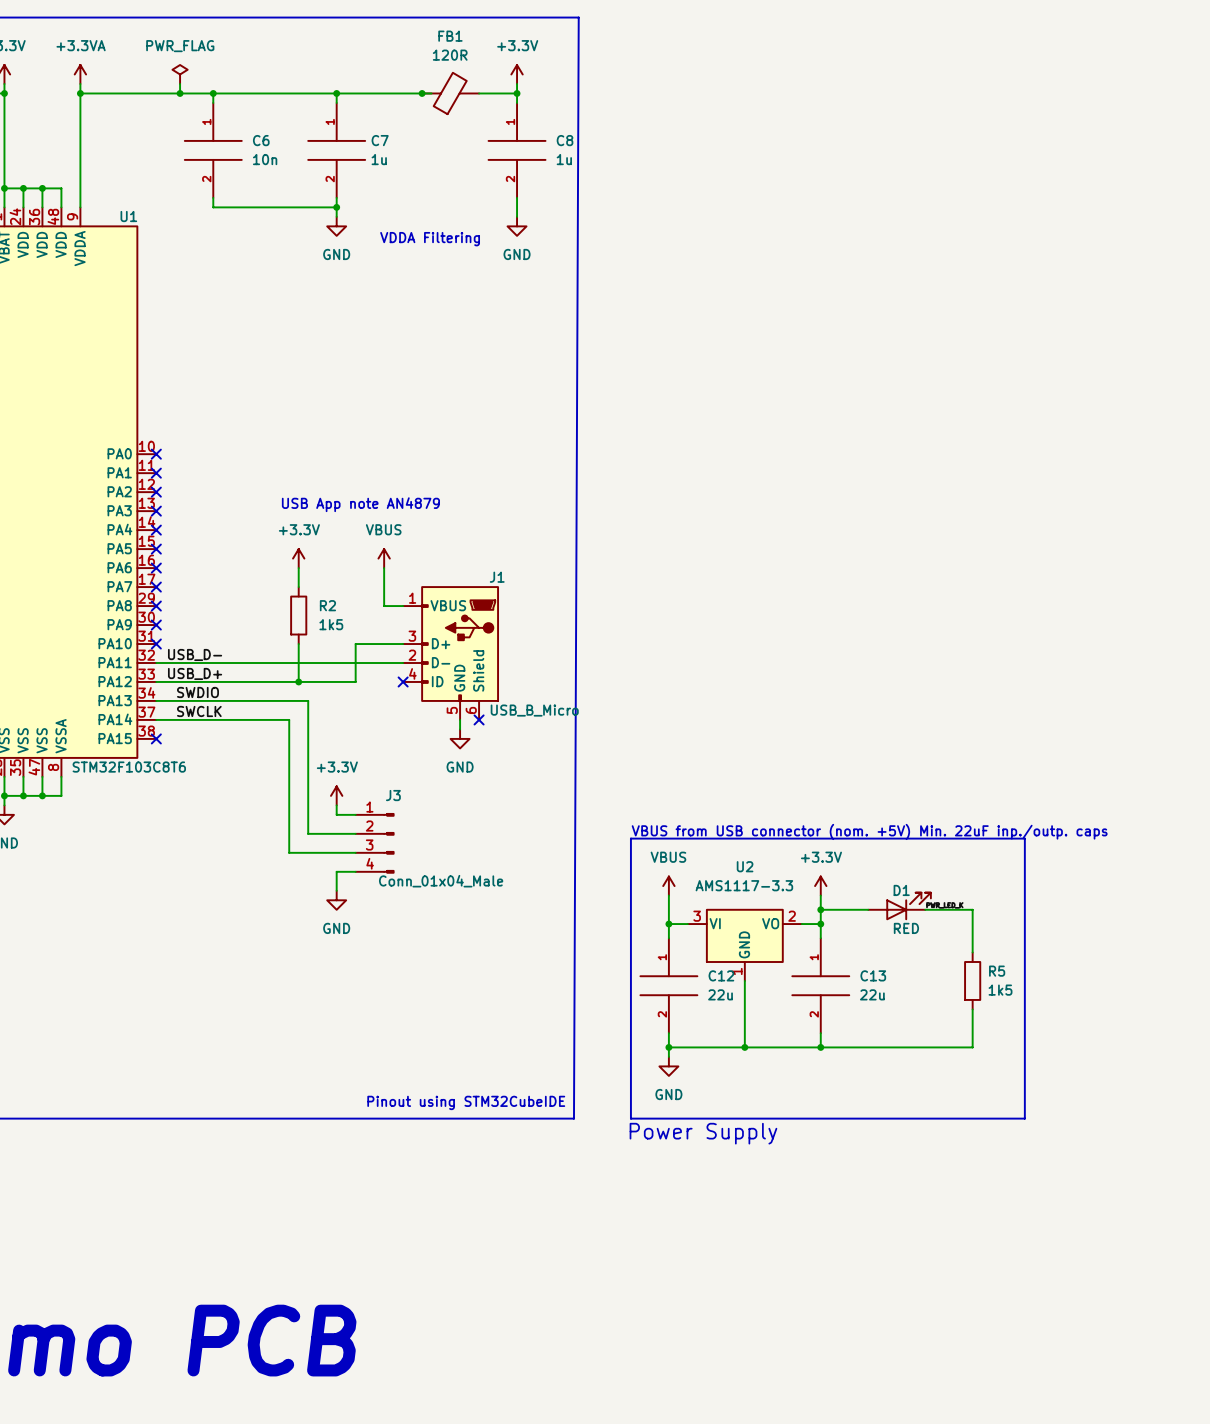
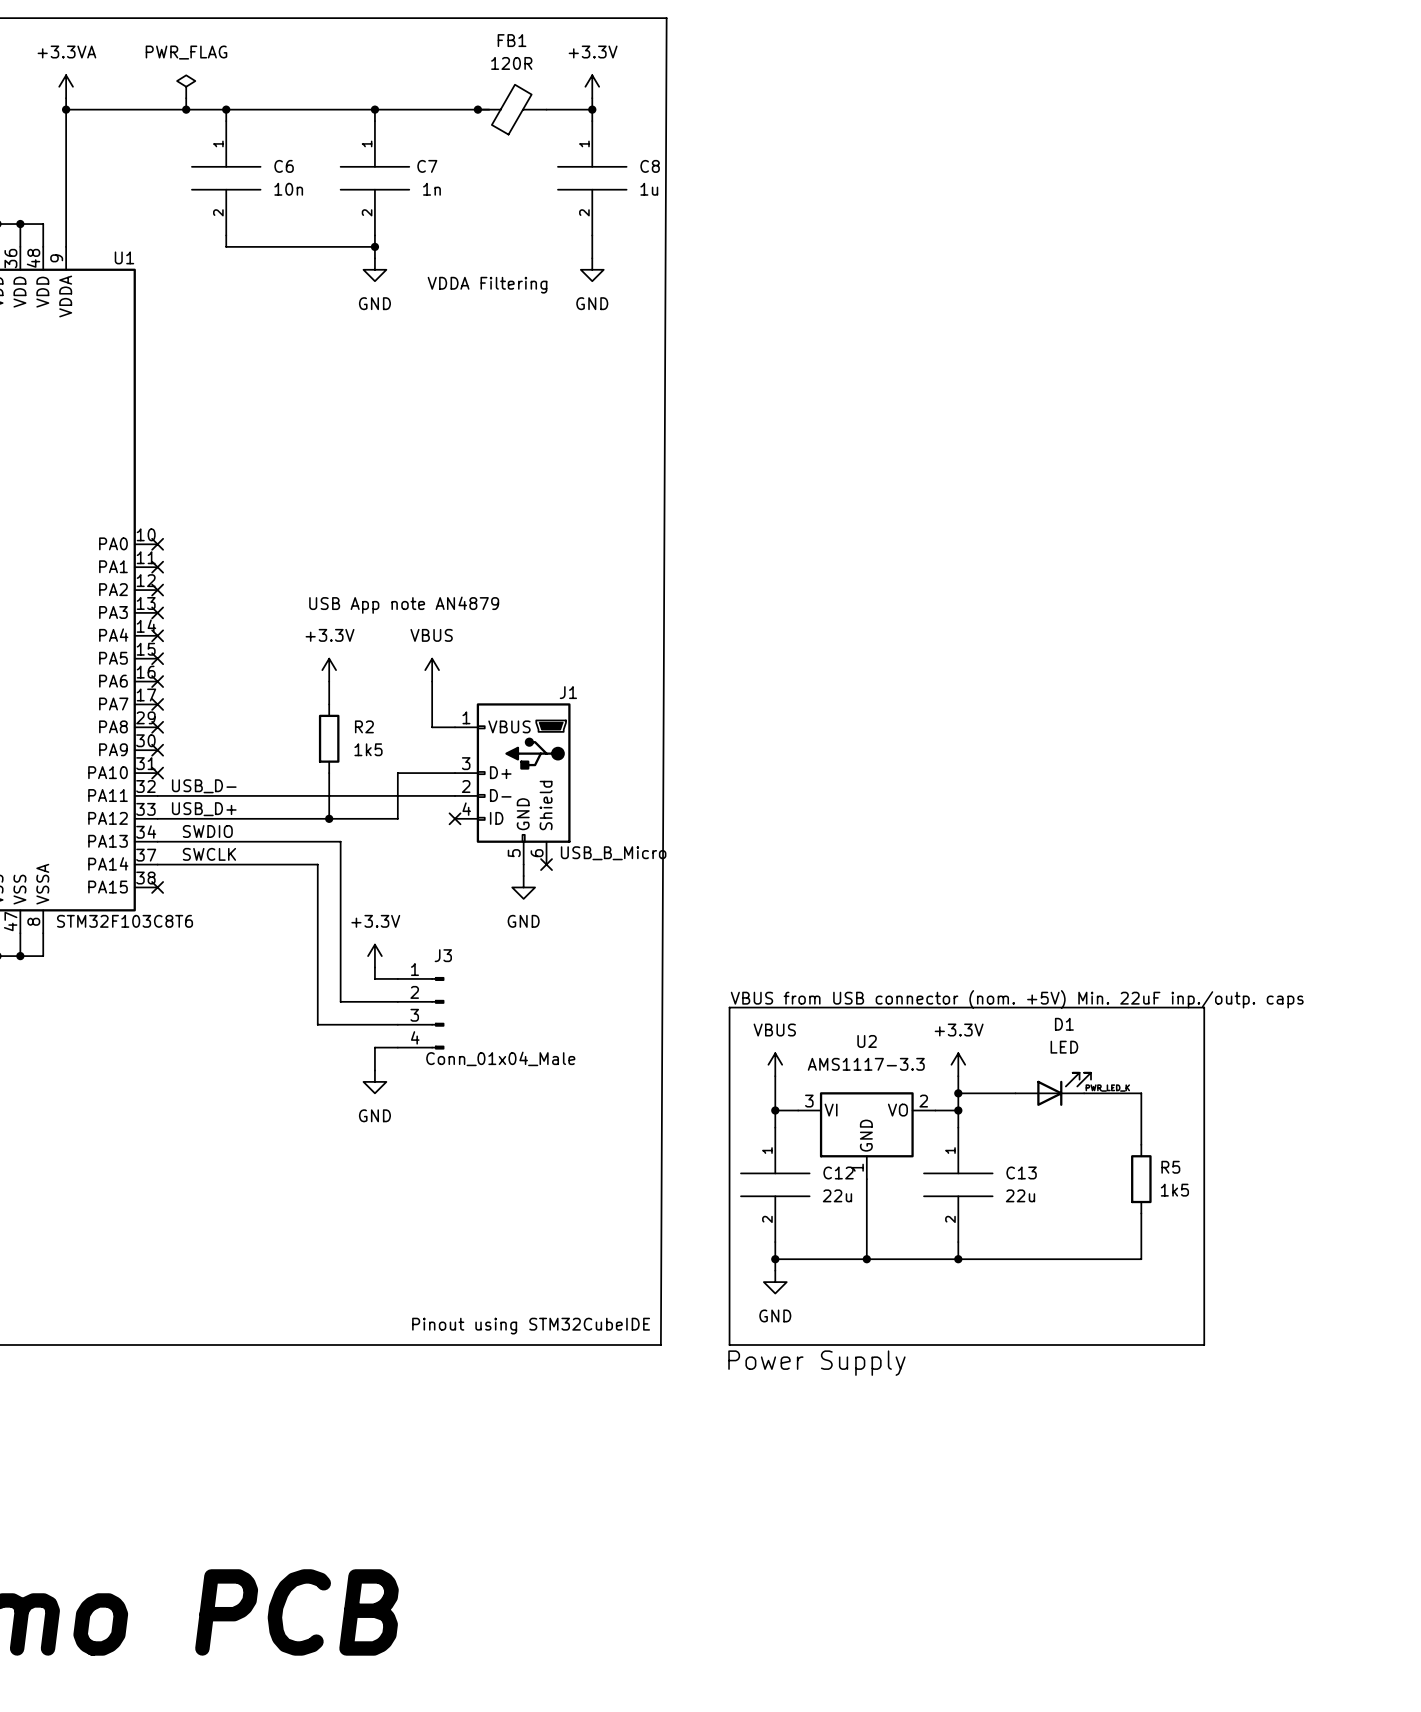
C7 value: 1u (379, 159) -> 1n (431, 189)
D1 name position: D1 (901, 890) -> D1 (1064, 1024)
D1 value: RED (906, 928) -> LED (1064, 1047)

